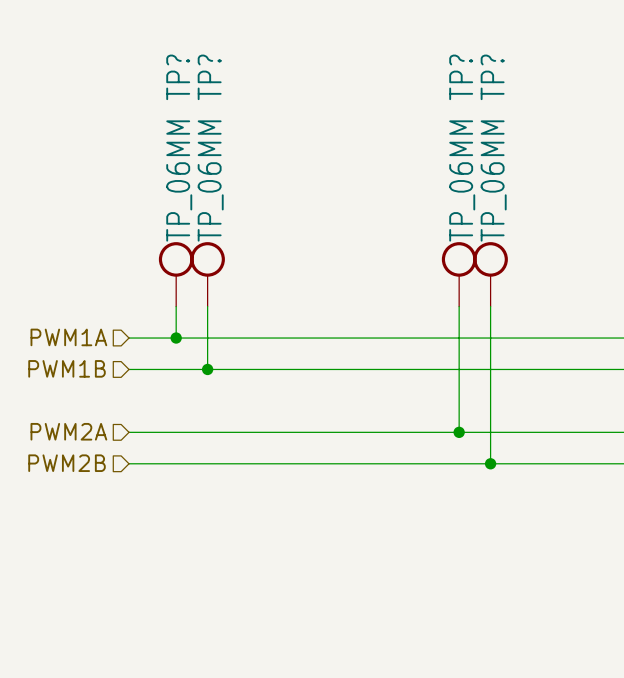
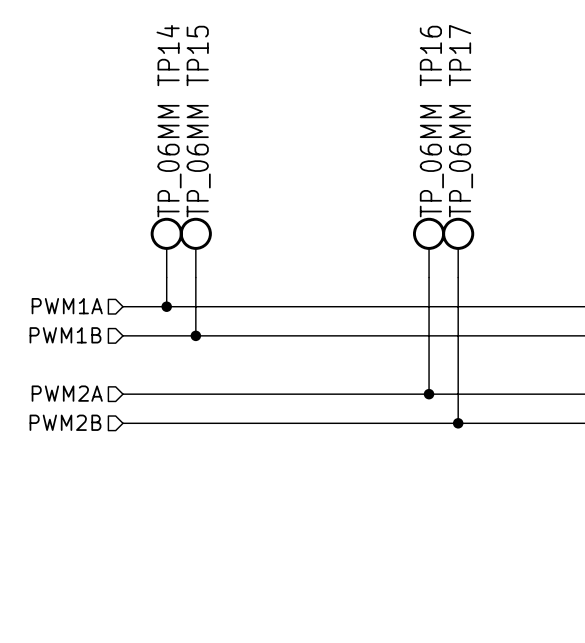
TP? name: TP? (178, 77) -> TP14 (168, 55)
TP? name: TP? (209, 77) -> TP15 (197, 55)
TP? name: TP? (461, 77) -> TP16 (430, 55)
TP? name: TP? (492, 77) -> TP17 (460, 55)

